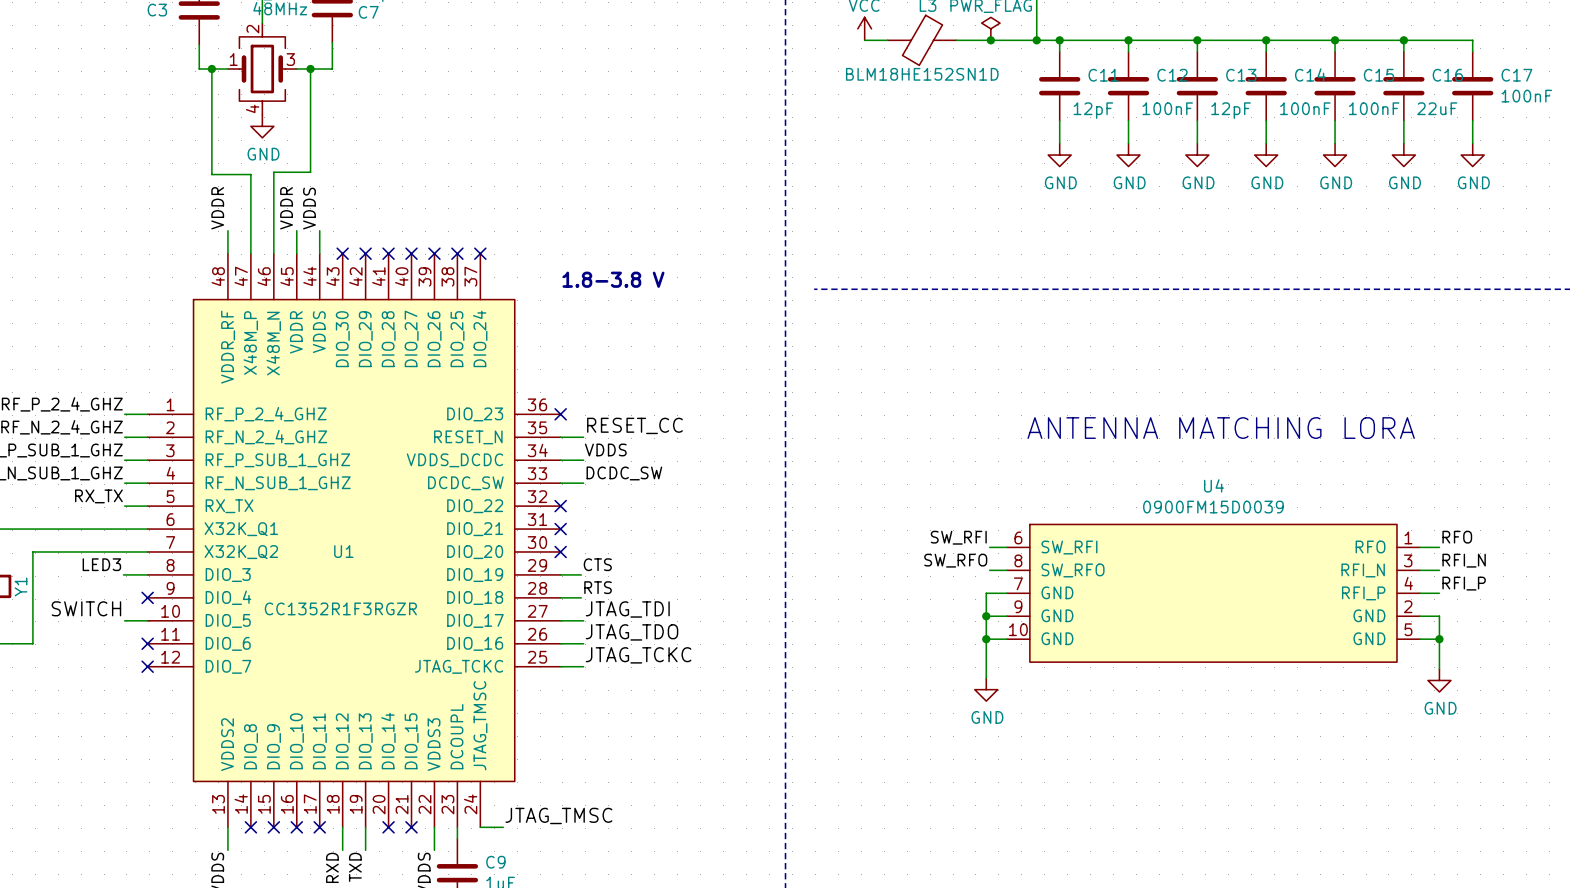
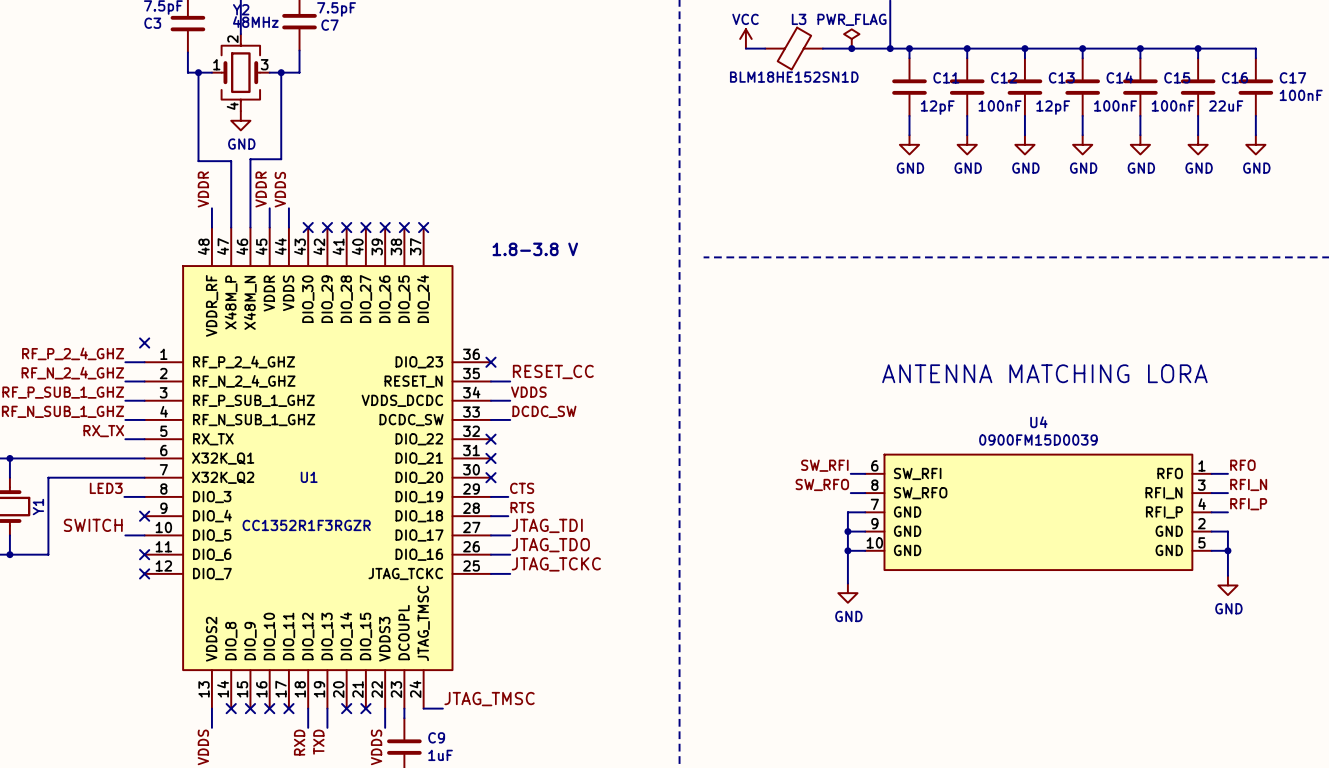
no-connect mark: none -> (144, 343)

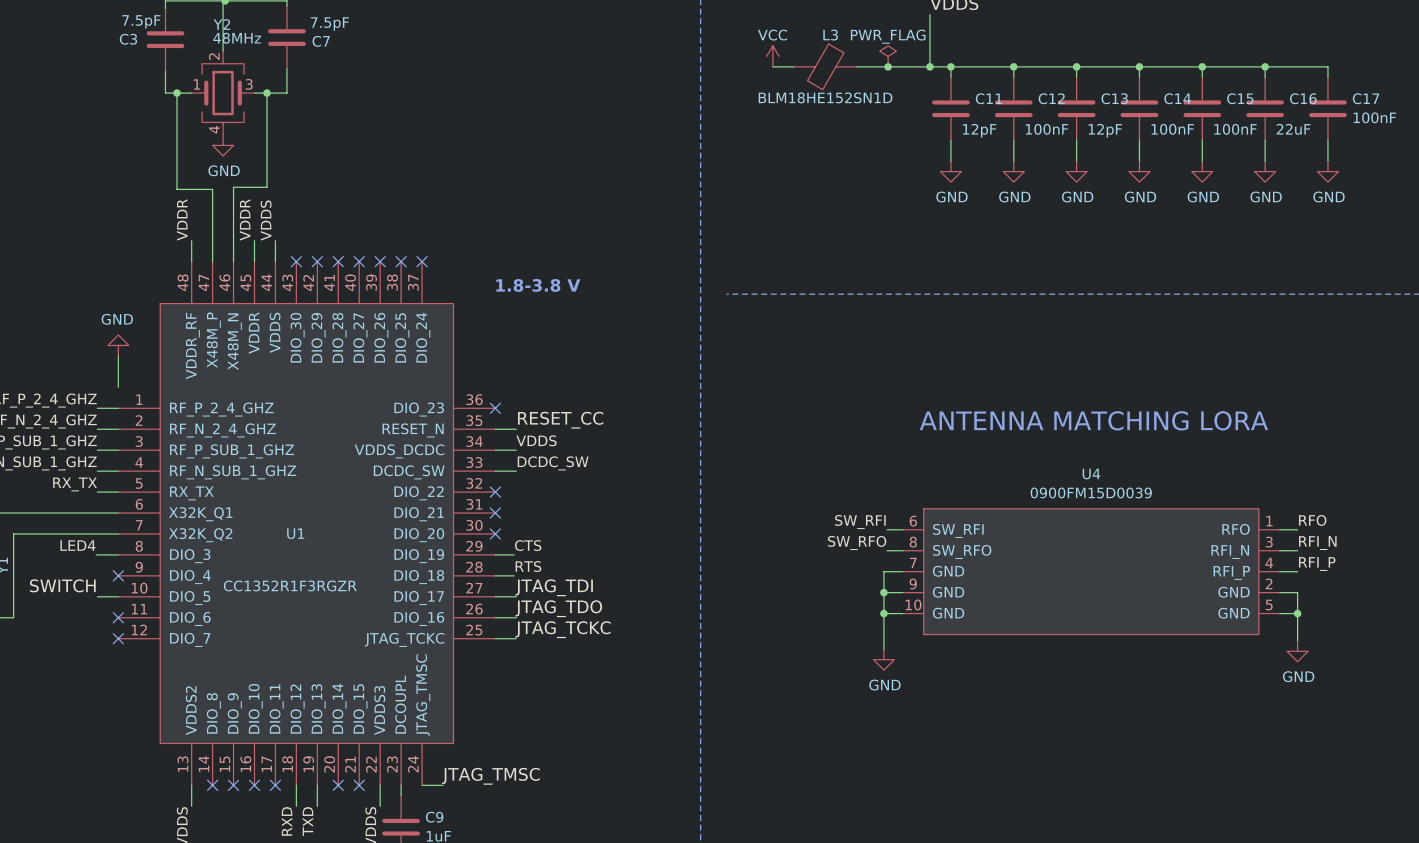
power symbol: none -> GND (118, 345)
wire: none -> (118, 355) (118, 387)
no-connect mark: (144, 343) -> none
label: LED3 (106, 488) -> LED4 (78, 545)

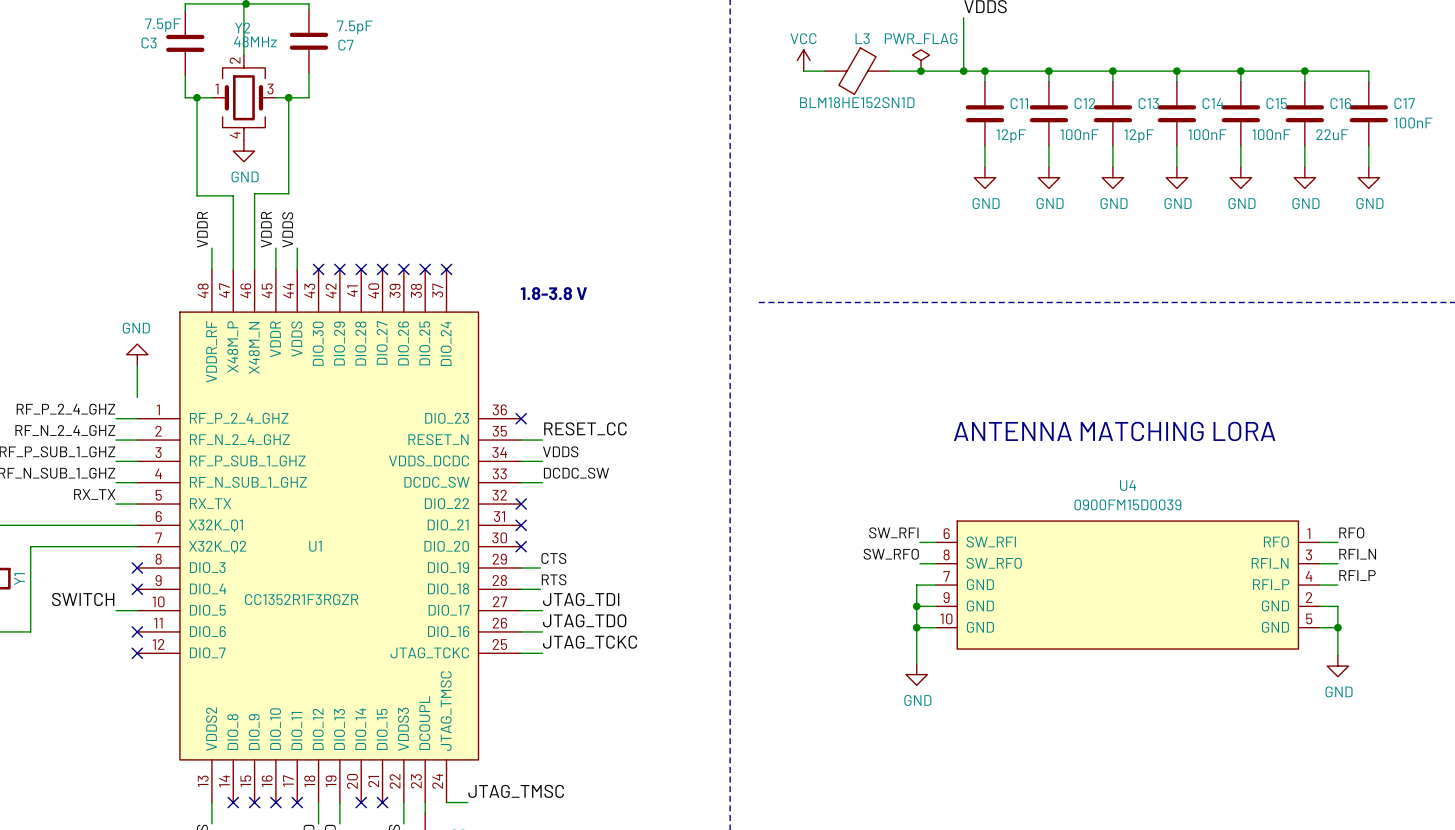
label: LED4 (78, 545) -> none
wire: (96, 554) (118, 554) -> none
no-connect mark: none -> (137, 567)

